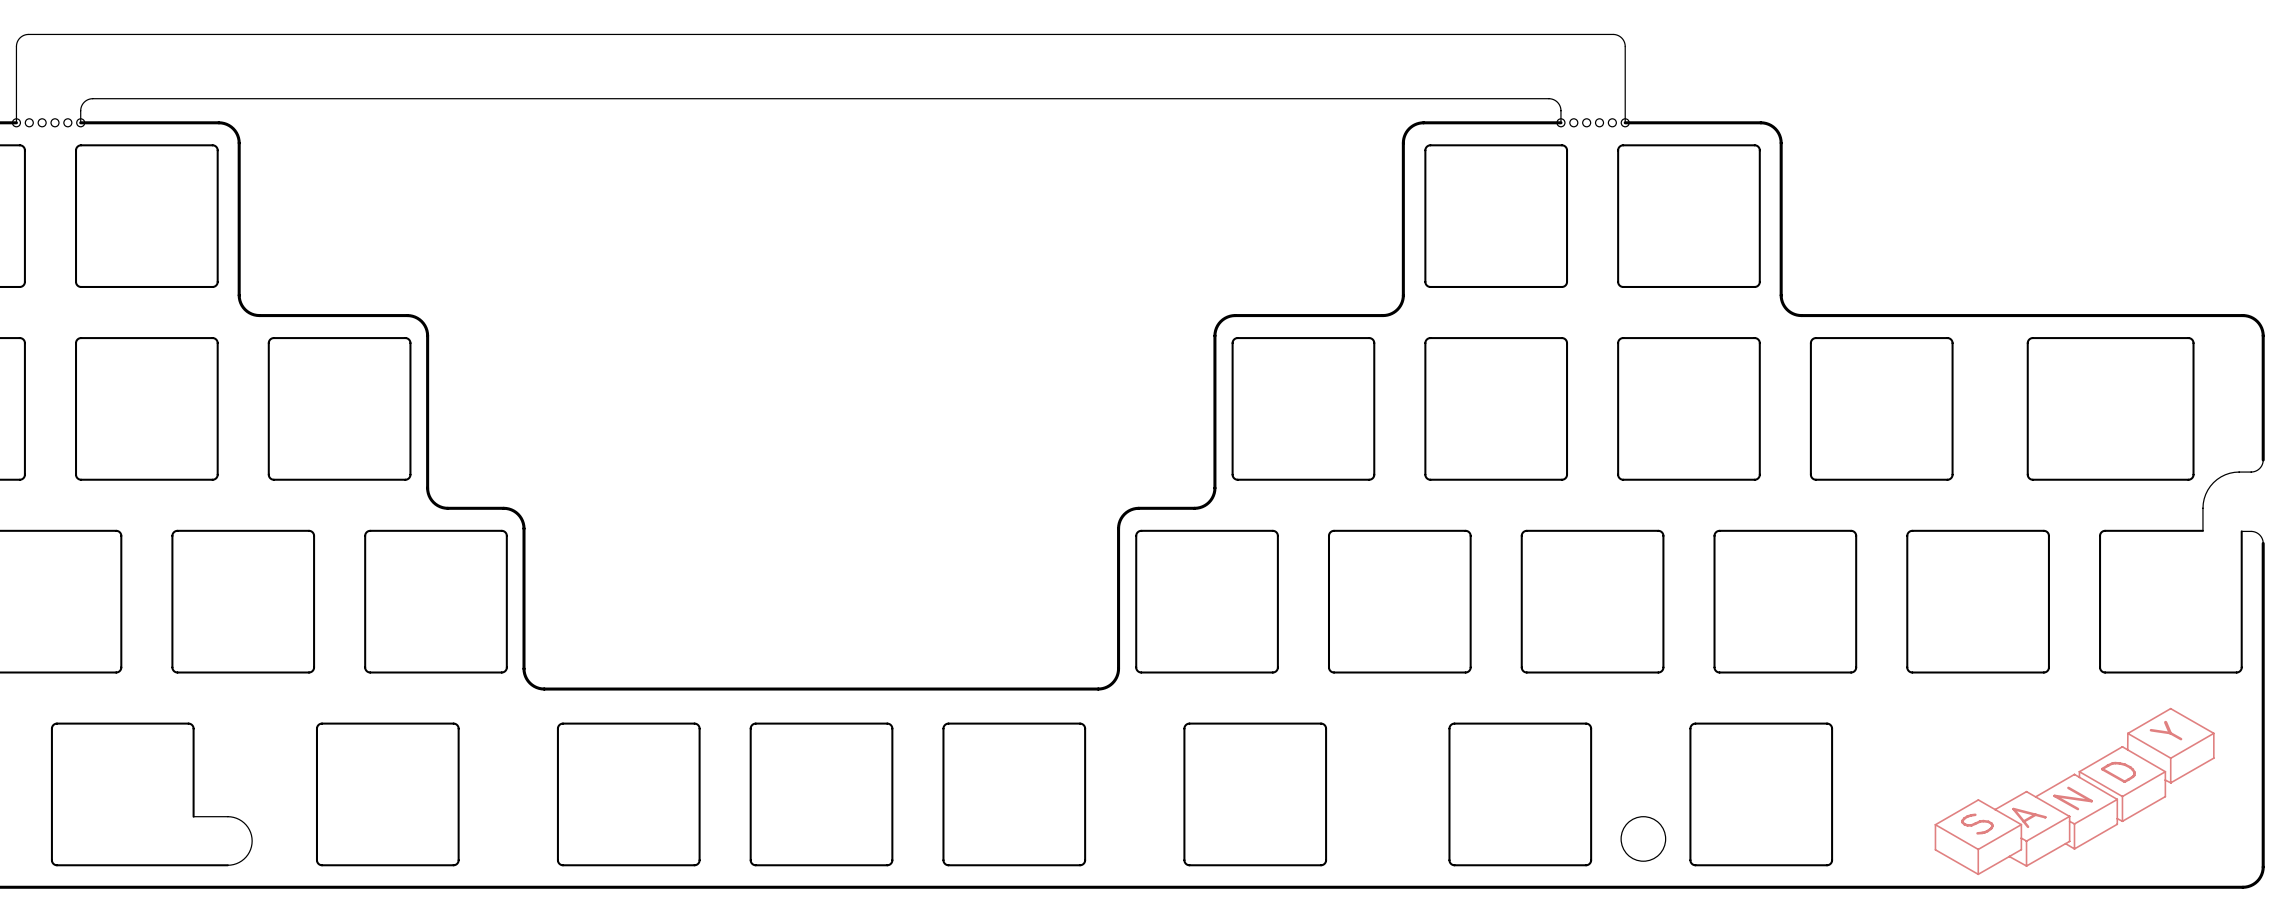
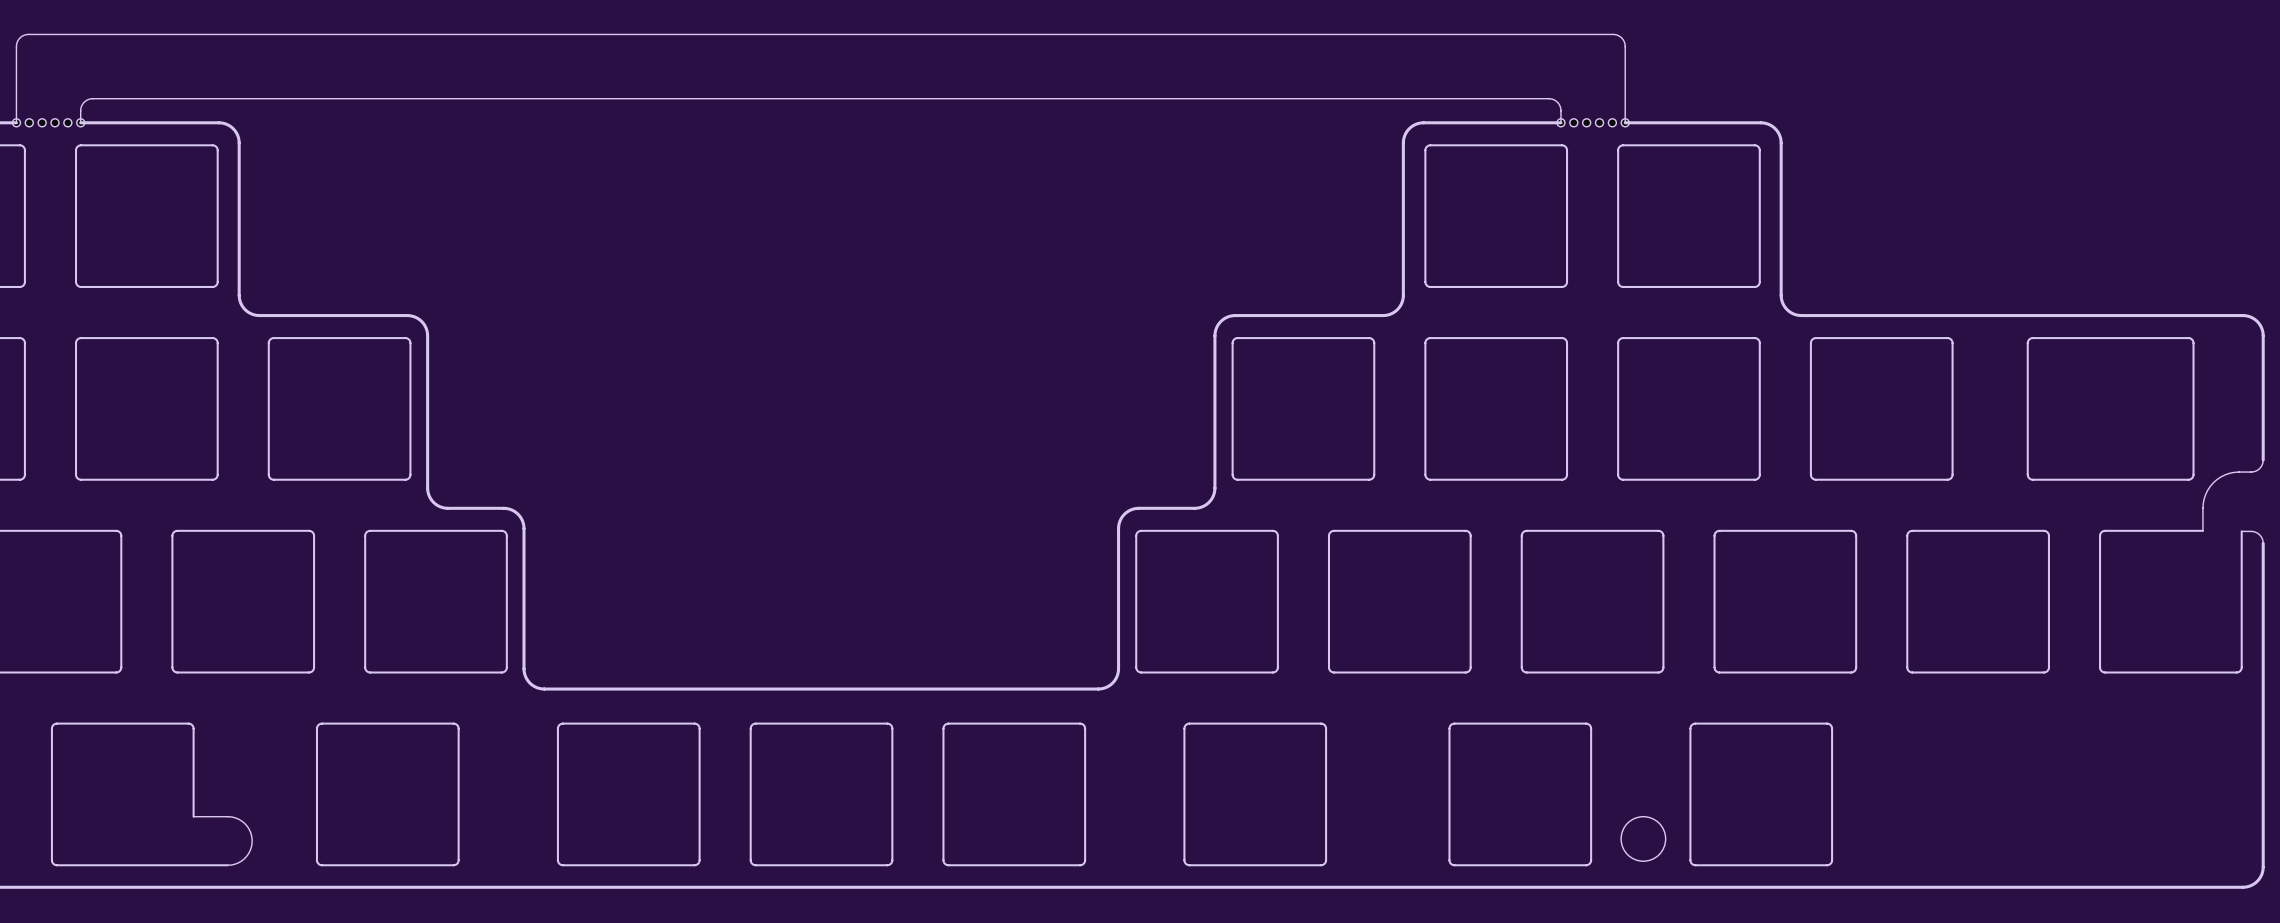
track: (2170, 708) (2127, 733) -> none
track: (2170, 708) (2213, 733) (2213, 758) (2170, 782) -> none
track: (2165, 722) (2170, 733) -> none
track: (2150, 730) (2170, 733) -> none
track: (2127, 733) (2127, 749) -> none
track: (2127, 733) (2170, 758) -> none
track: (2170, 733) (2181, 739) -> none
track: (2213, 733) (2170, 758) (2170, 782) (2165, 780) -> none
track: (2122, 746) (2079, 771) -> none
track: (2122, 746) (2165, 771) -> none
track: (2132, 769) (2134, 775) (2124, 781) (2102, 769) (2115, 763) (2125, 764) (2132, 769) -> none
track: (2079, 771) (2079, 777) -> none
track: (2079, 771) (2122, 796) -> none
track: (2165, 771) (2122, 796) -> none
track: (2165, 771) (2165, 796) (2122, 821) -> none
track: (2068, 787) (2091, 801) (2054, 795) (2077, 809) -> none
track: (2035, 796) (2074, 774) (2117, 799) -> none
track: (2122, 796) (2122, 821) -> none
track: (2117, 799) (2117, 824) -> none
track: (2117, 799) (2074, 823) -> none
track: (1995, 809) (2026, 791) (2069, 816) (2026, 841) (2026, 866) -> none
track: (1975, 814) (1967, 816) (1962, 822) (1971, 825) (1983, 821) (1988, 821) (1992, 825) (1987, 831) (1977, 833) -> none
track: (2035, 814) (2023, 821) -> none
track: (2069, 816) (2069, 841) -> none
track: (2045, 817) (2013, 809) (2023, 821) -> none
track: (2117, 818) (2122, 821) -> none
track: (2023, 821) (2028, 826) -> none
track: (2069, 821) (2074, 823) -> none
track: (2074, 823) (2074, 848) -> none
track: (1935, 824) (1978, 849) -> none
track: (1935, 824) (1935, 849) (1978, 874) -> none
track: (2021, 824) (1978, 799) (1935, 824) -> none
track: (2021, 824) (2021, 849) (1978, 874) -> none
track: (2021, 824) (1978, 849) -> none
track: (2117, 824) (2074, 848) -> none
track: (2021, 838) (2026, 841) -> none
track: (2069, 841) (2026, 866) -> none
track: (2065, 843) (2074, 848) -> none
track: (1978, 849) (1978, 874) -> none
track: (2009, 856) (2026, 866) -> none

